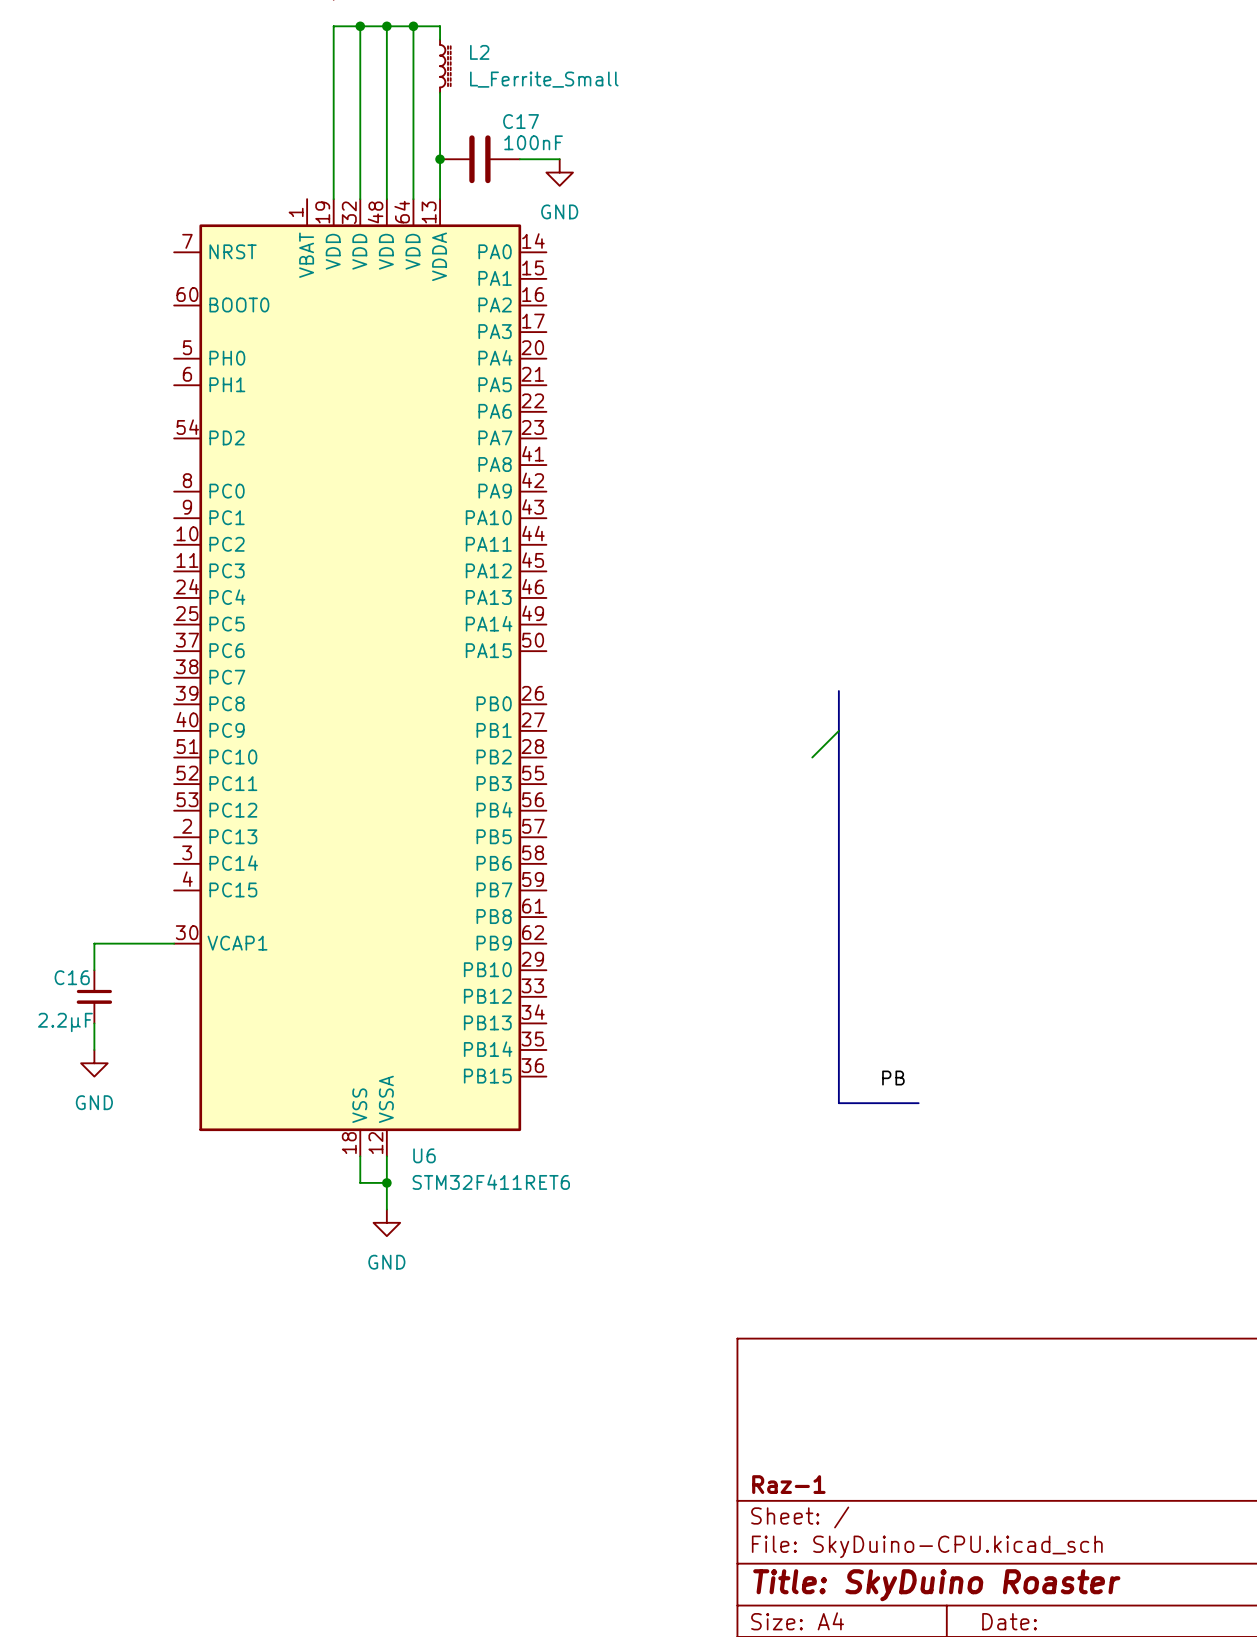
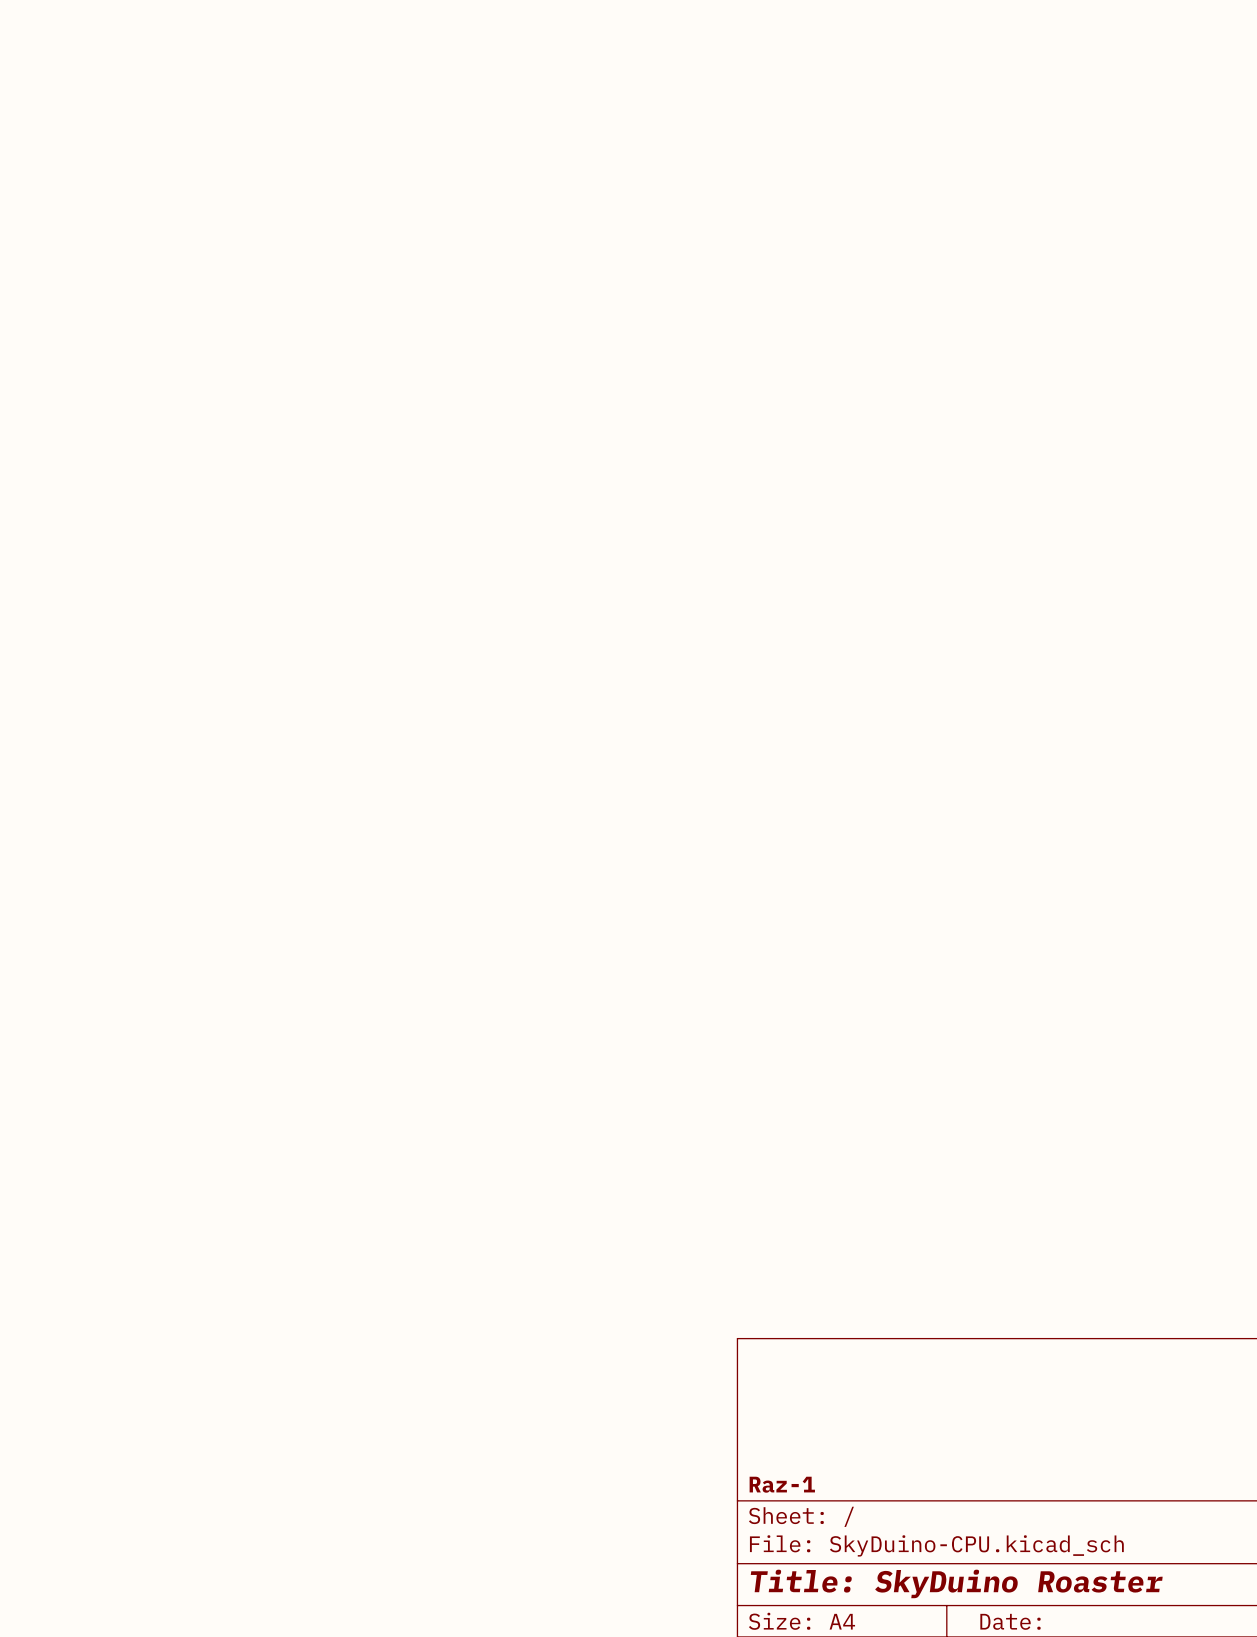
wire: (360, 26) (360, 199) -> none
junction: (360, 26) -> none
wire: (386, 26) (386, 199) -> none
junction: (386, 26) -> none
wire: (413, 26) (413, 199) -> none
junction: (413, 26) -> none
wire: (440, 39) (440, 26) (333, 26) (333, 199) -> none
L2: L_Ferrite_Small (445, 66) -> none
wire: (440, 92) (440, 199) -> none
junction: (440, 159) -> none
C17: 100nF (479, 159) -> none
wire: (519, 159) (559, 159) -> none
power symbol: GND (559, 172) -> none
U6: STM32F411RET6 (360, 677) -> none
bus: (838, 691) (838, 1103) (918, 1103) -> none
wire: (838, 730) (812, 757) -> none
wire: (174, 943) (94, 943) (94, 970) -> none
C16: 2.2µF (94, 996) -> none
wire: (94, 1023) (94, 1049) -> none
power symbol: GND (94, 1063) -> none
label: PB (893, 1078) -> none
wire: (360, 1156) (360, 1182) (386, 1182) -> none
wire: (386, 1156) (386, 1209) -> none
junction: (386, 1182) -> none
power symbol: GND (386, 1222) -> none

